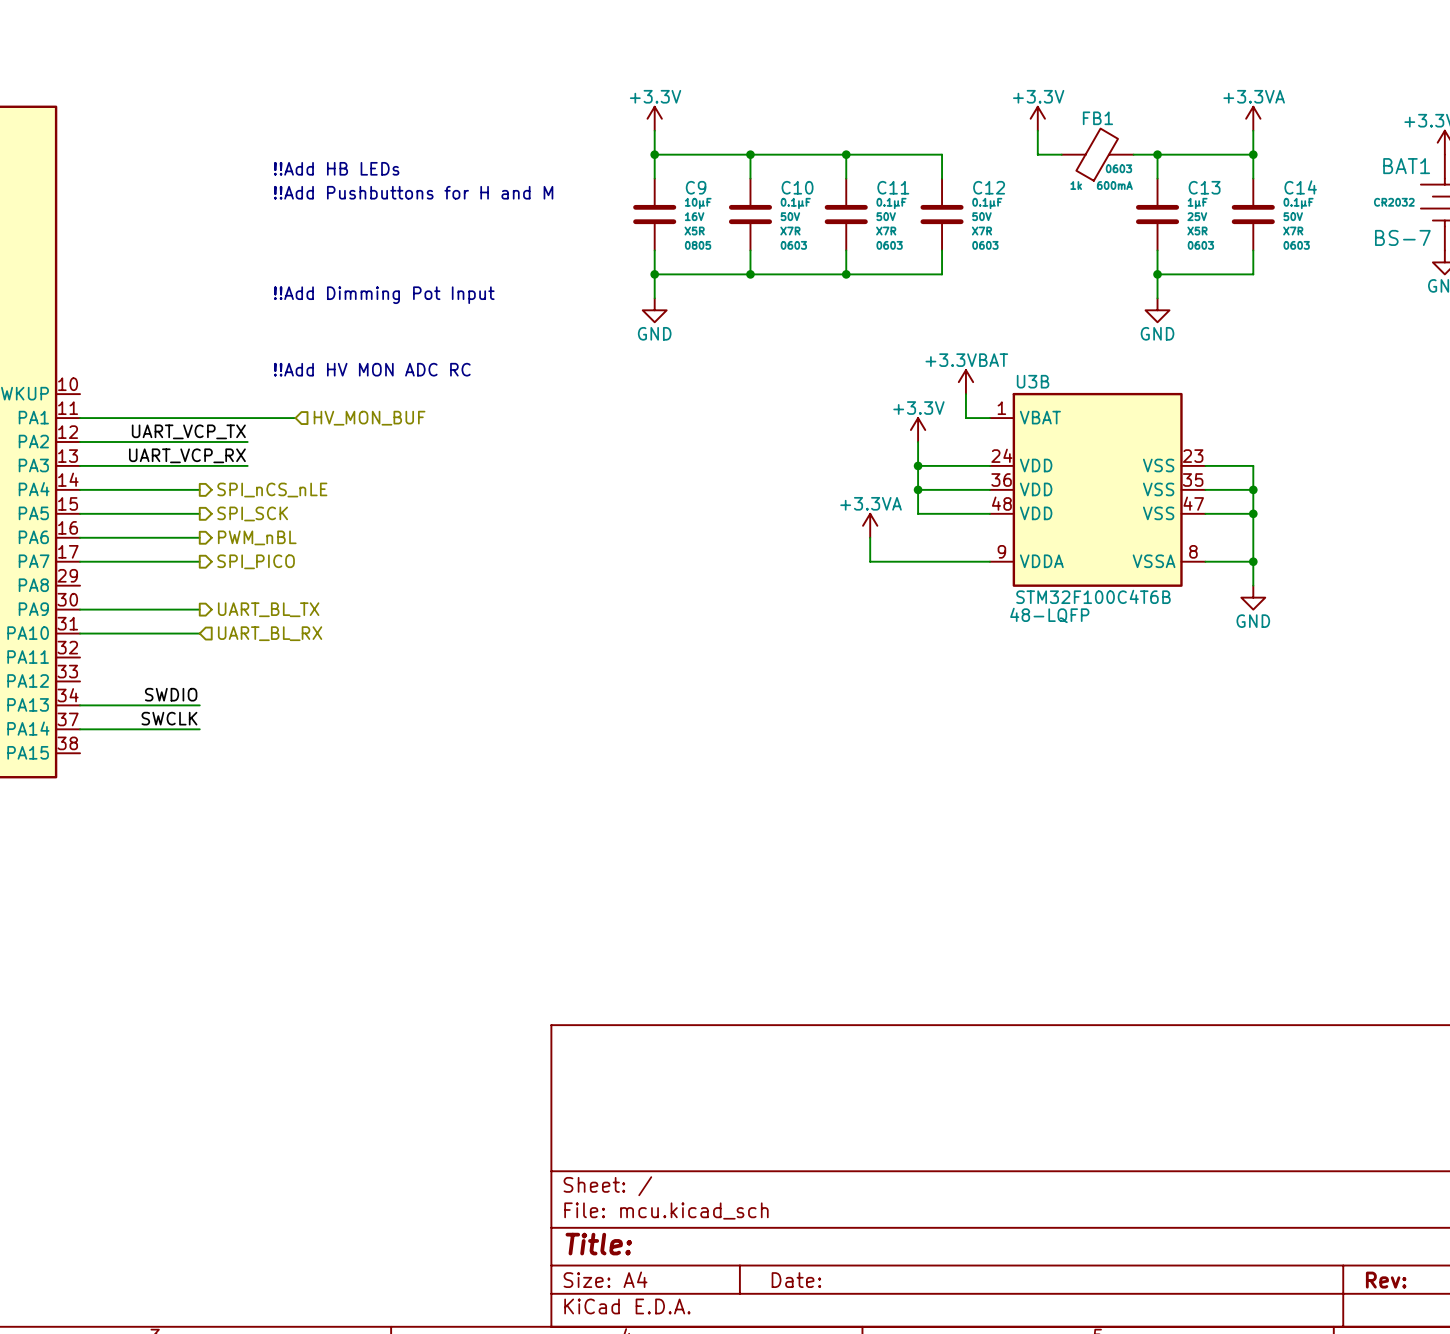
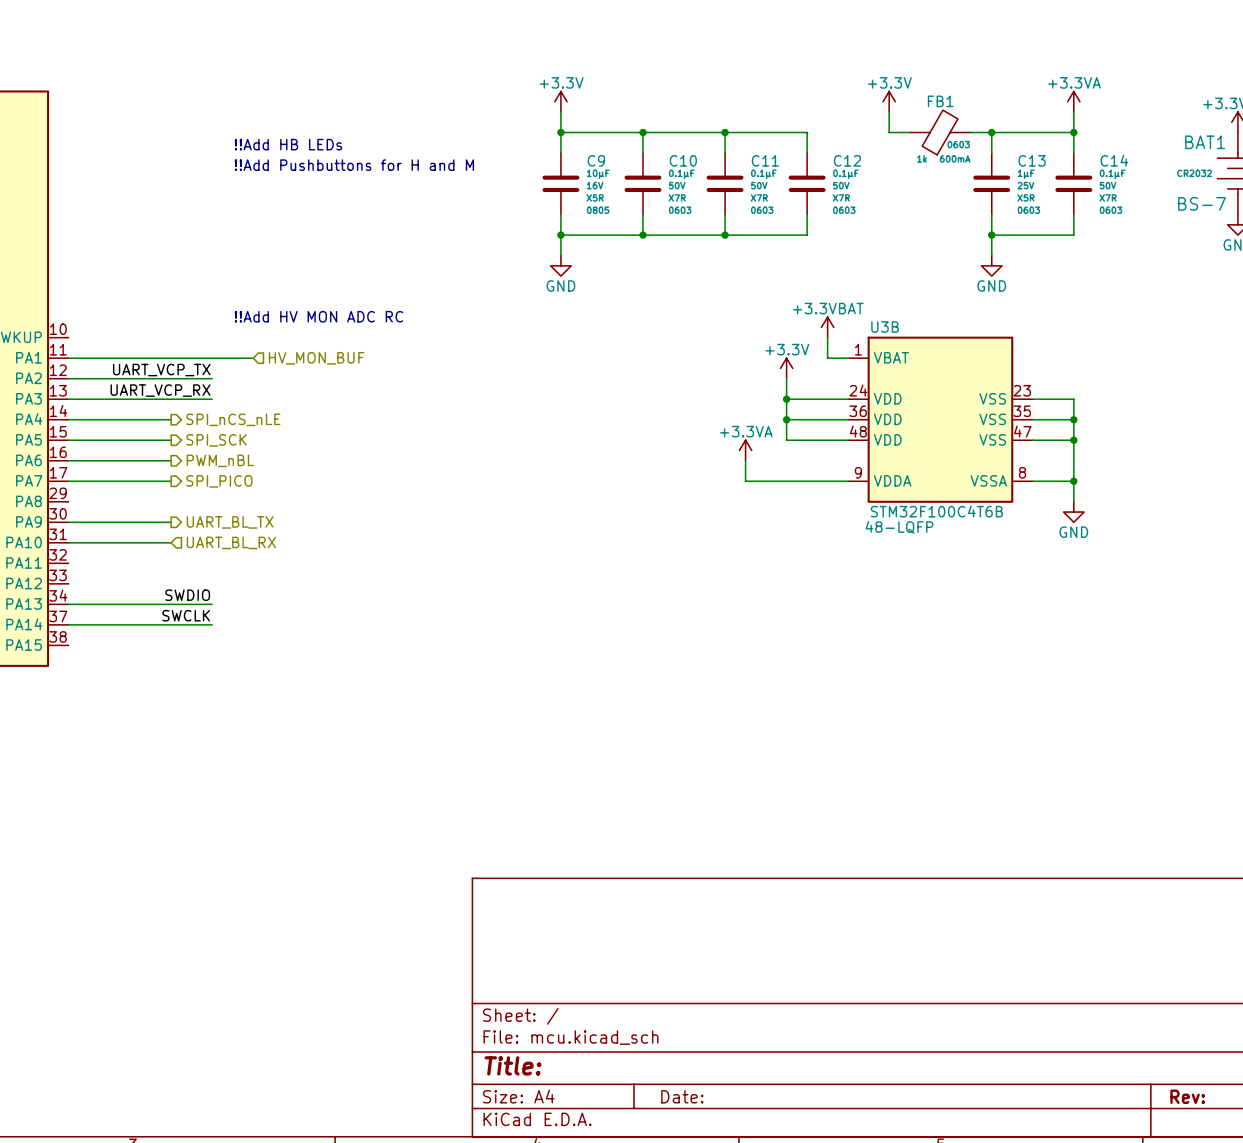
text: !!Add Dimming Pot Input (384, 295) -> none
label position: SWDIO (171, 694) -> SWDIO (187, 595)
wire: none -> (171, 604) (212, 604)
label position: SWCLK (169, 718) -> SWCLK (186, 615)
wire: none -> (171, 624) (212, 624)

